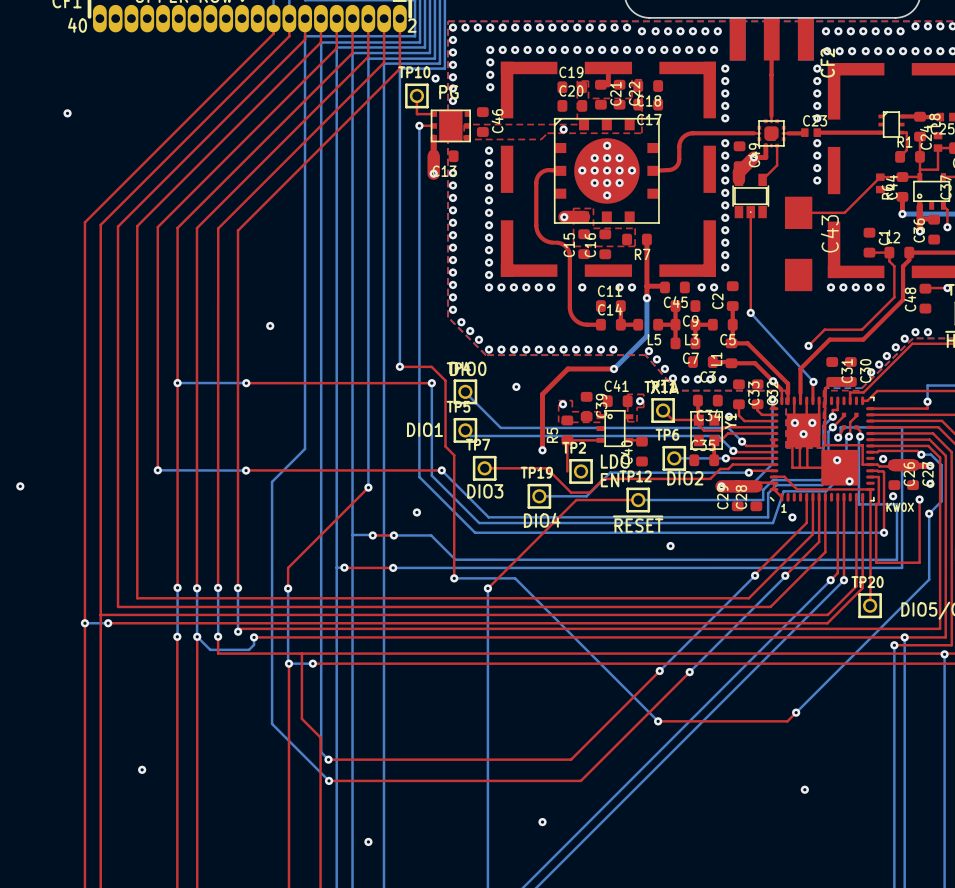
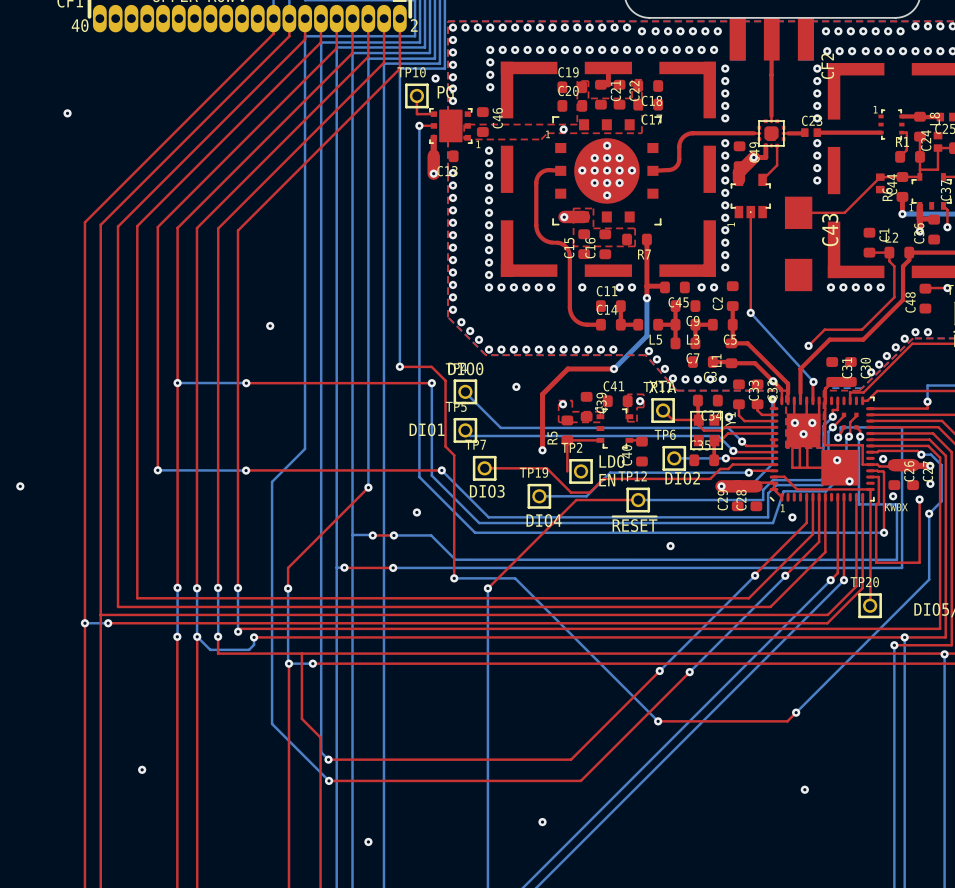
part footprint: [430, 109, 471, 143] -> [429, 108, 473, 144]
part footprint: [878, 111, 905, 138] -> [878, 109, 905, 140]
part footprint: [553, 117, 660, 224] -> [552, 116, 662, 226]
part footprint: [732, 173, 770, 219] -> [730, 173, 771, 219]
part footprint: [913, 173, 951, 210] -> [911, 173, 952, 210]
part footprint: [596, 410, 634, 448] -> [596, 408, 634, 449]

